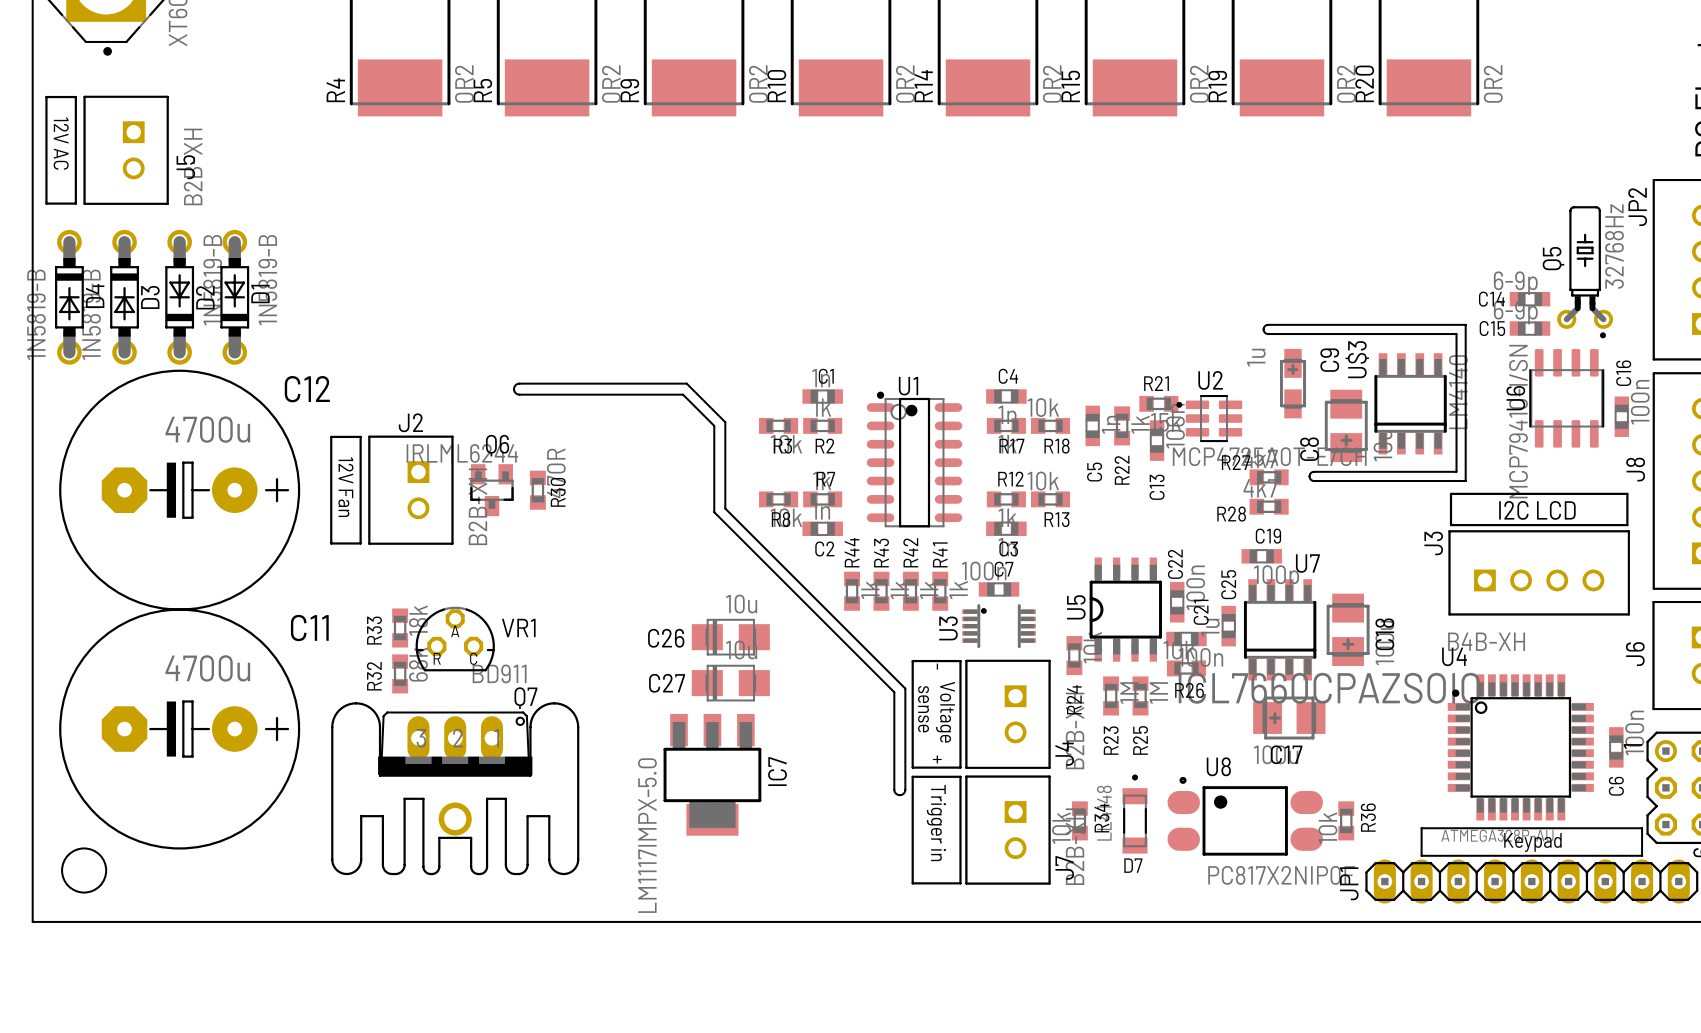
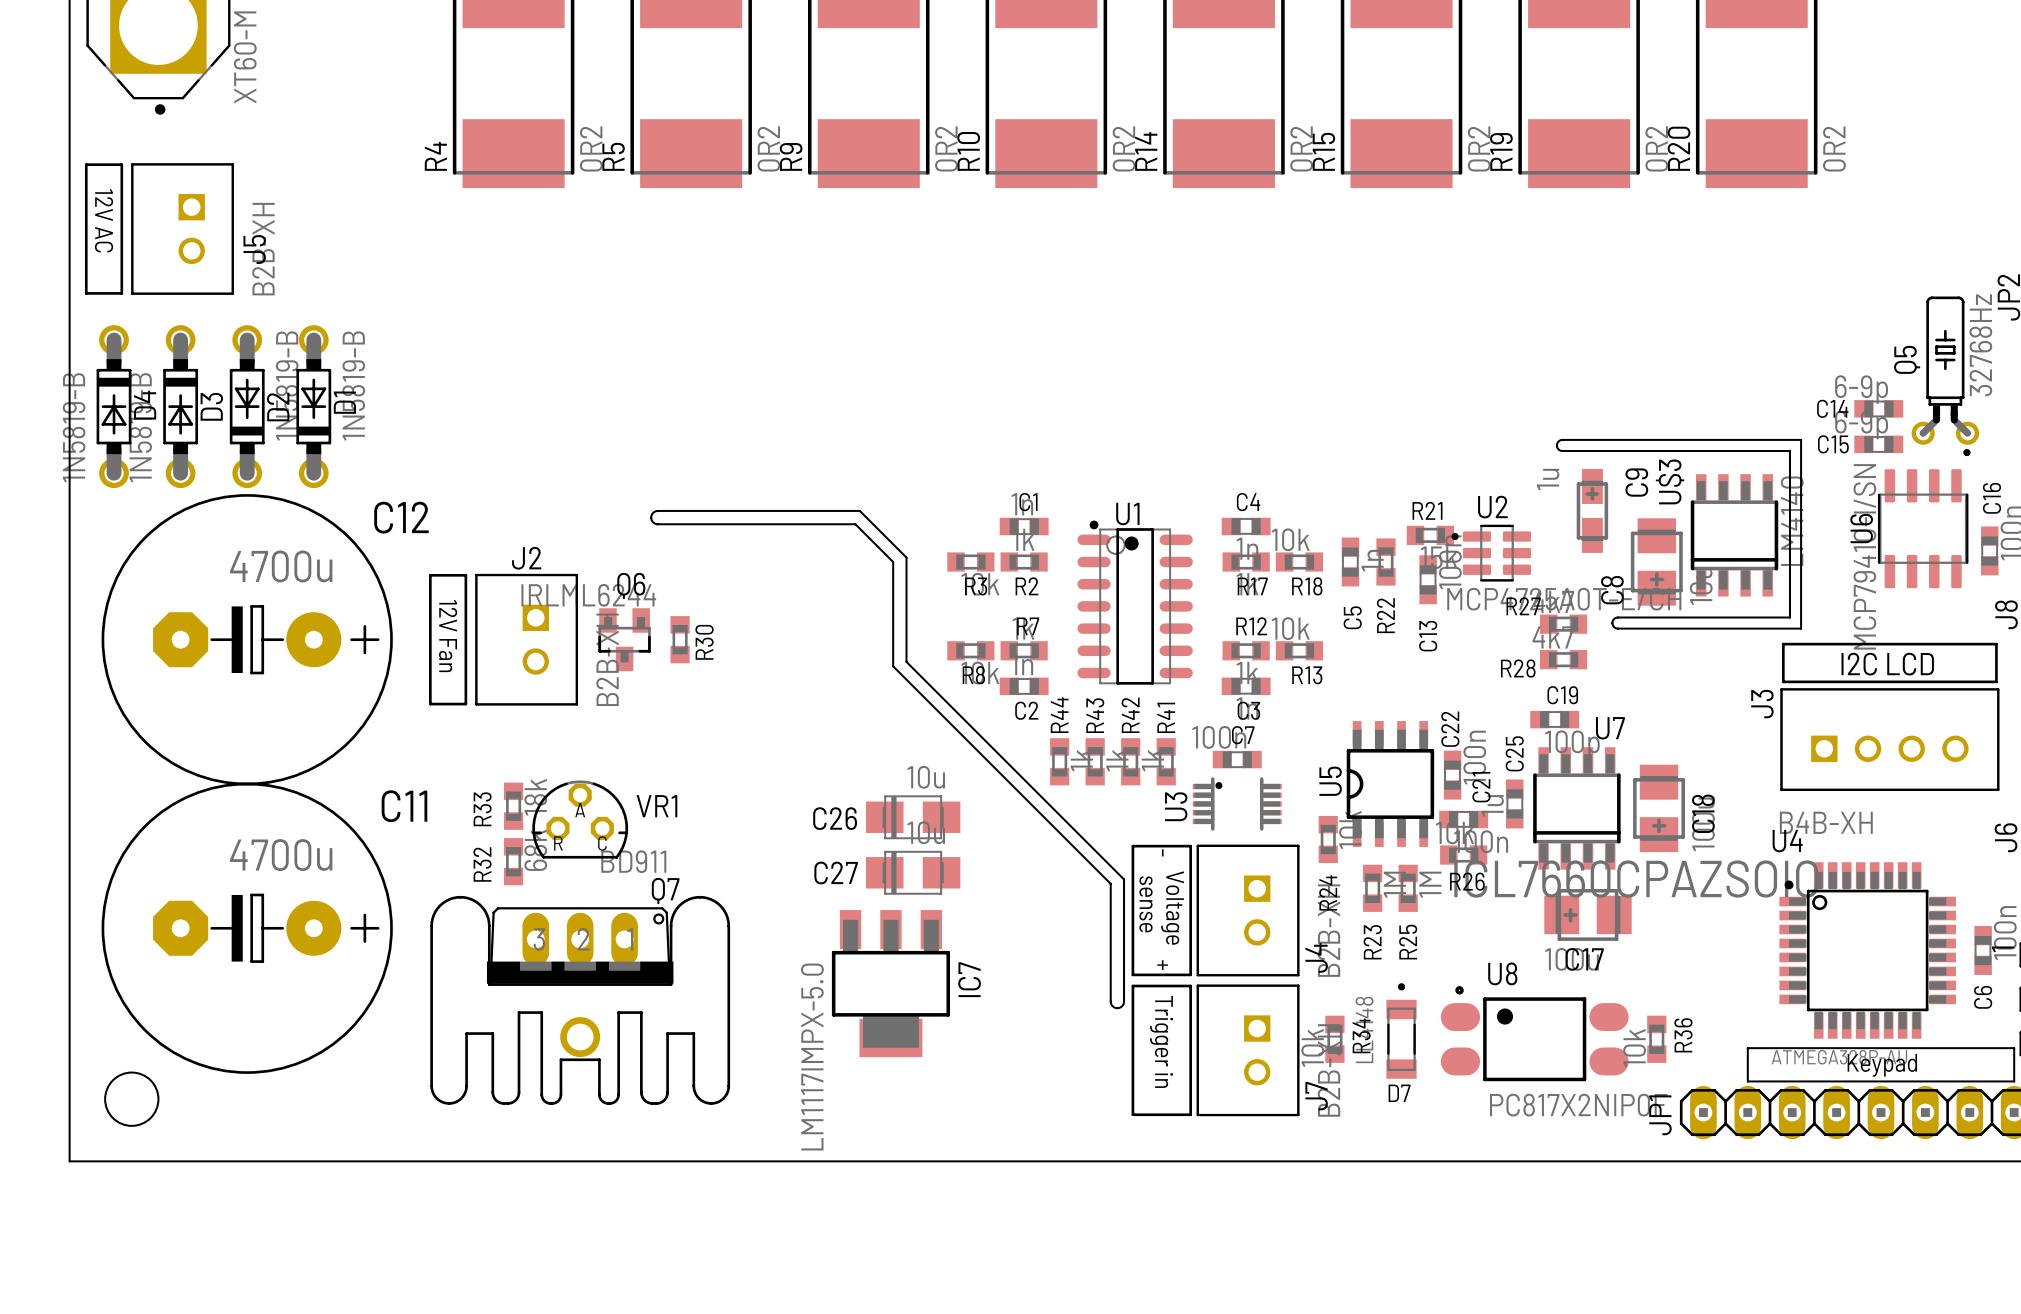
R22 value: 1k (1140, 424) -> none
R30 value: 470R (556, 473) -> none
R41 value: 1k (958, 590) -> none

